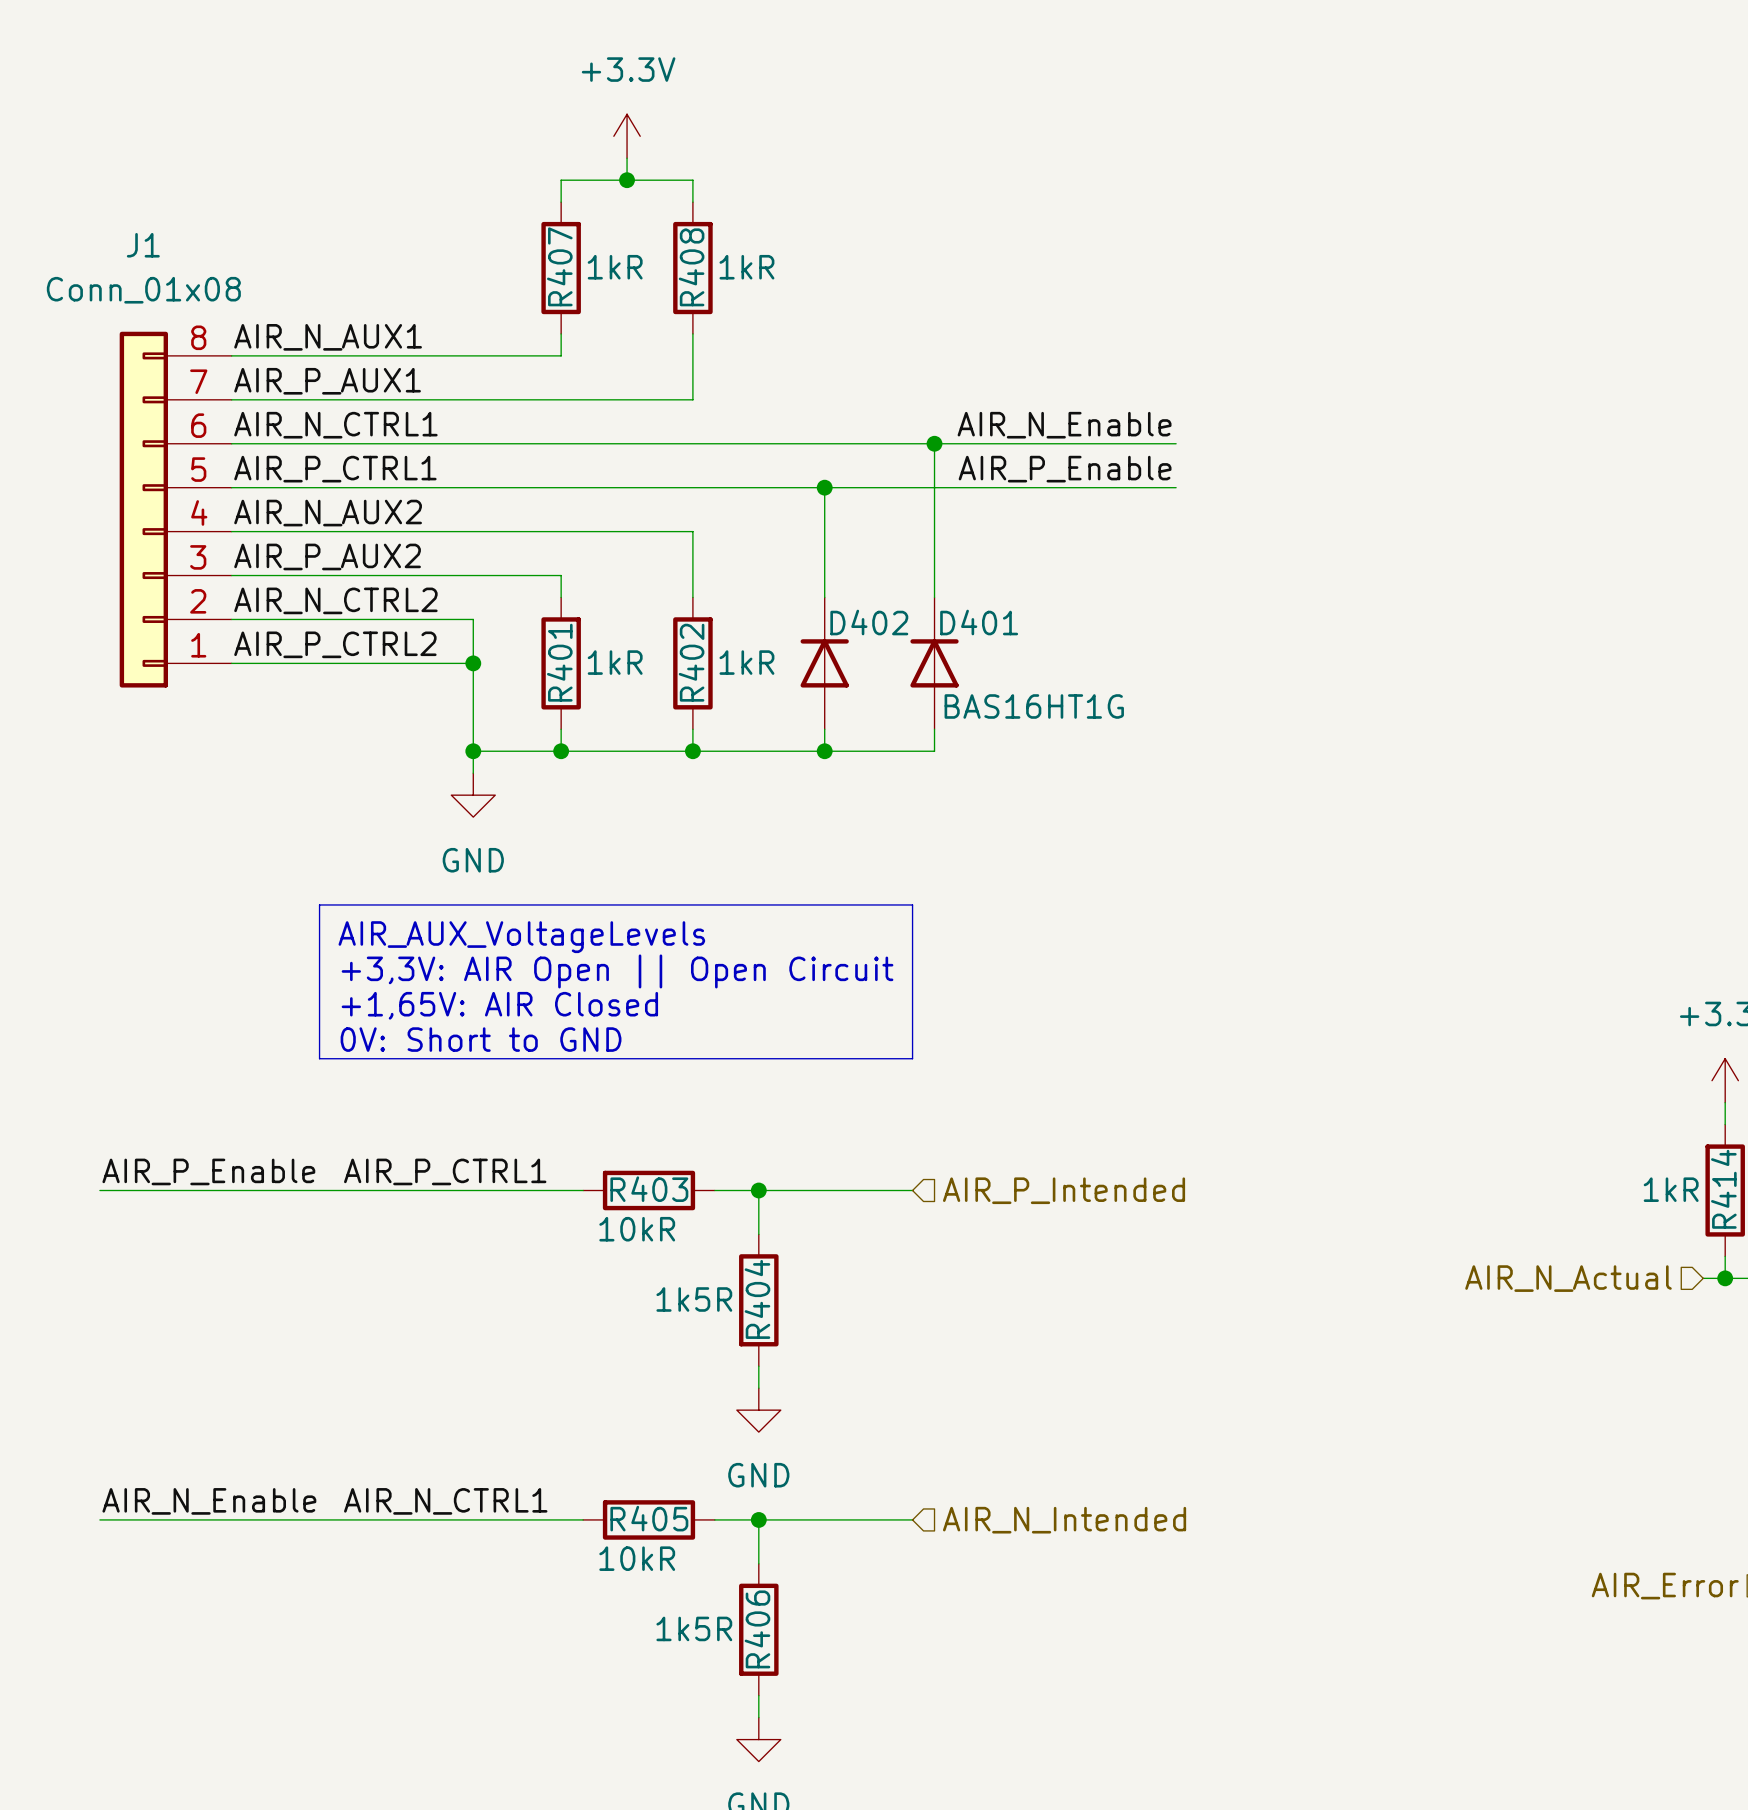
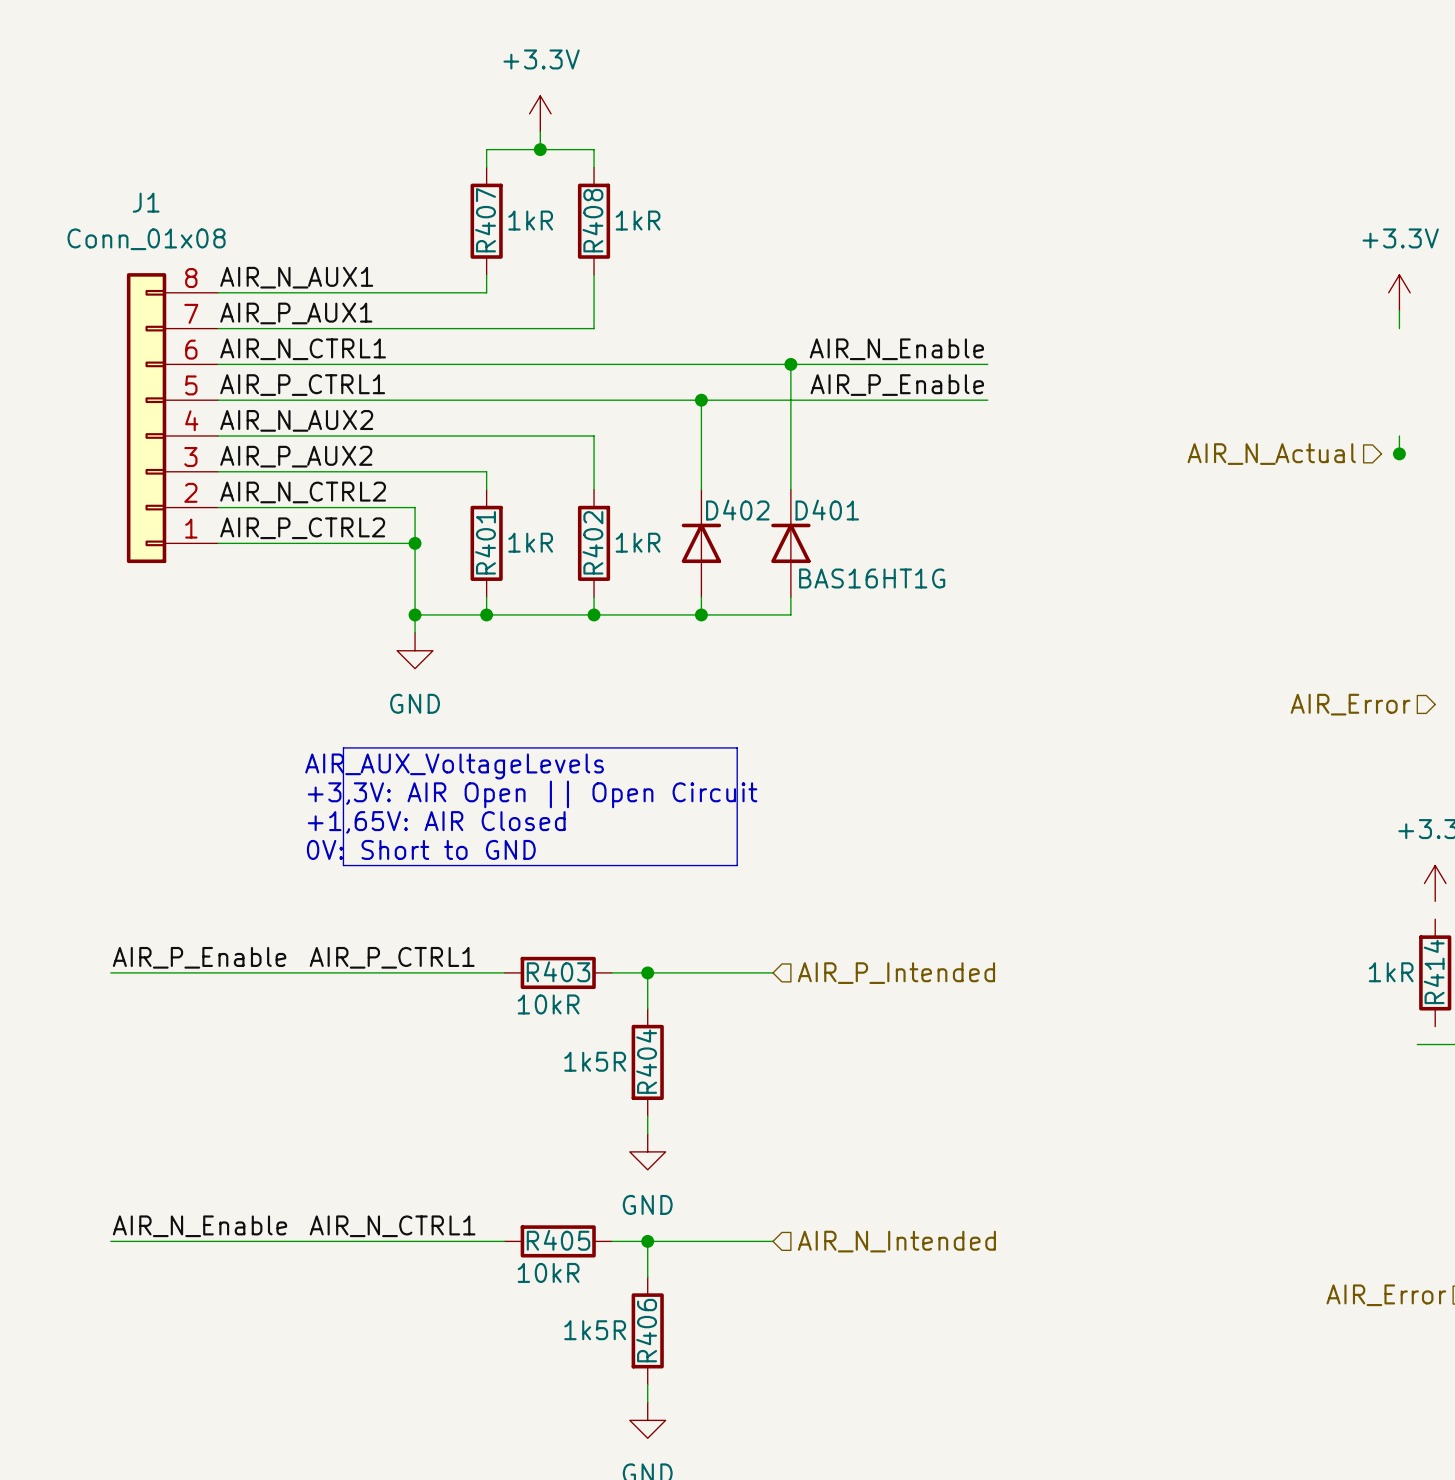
power symbol: none -> +3.3V (1399, 292)
wire: none -> (1399, 310) (1399, 328)
wire: none -> (1399, 435) (1399, 453)
hierarchical label: none -> AIR_N_Actual (1271, 454)
junction: none -> (1399, 453)
hierarchical label: none -> AIR_Error (1350, 704)
line: (385, 1058) (319, 1058) (319, 904) (912, 904) (912, 1058) (868, 1058) -> (343, 865) (343, 747) (737, 747) (737, 865)
wire: (1725, 1102) (1725, 1124) -> none
wire: (1725, 1256) (1725, 1278) -> none
hierarchical label: AIR_N_Actual (1568, 1278) -> none
junction: (1725, 1278) -> none

